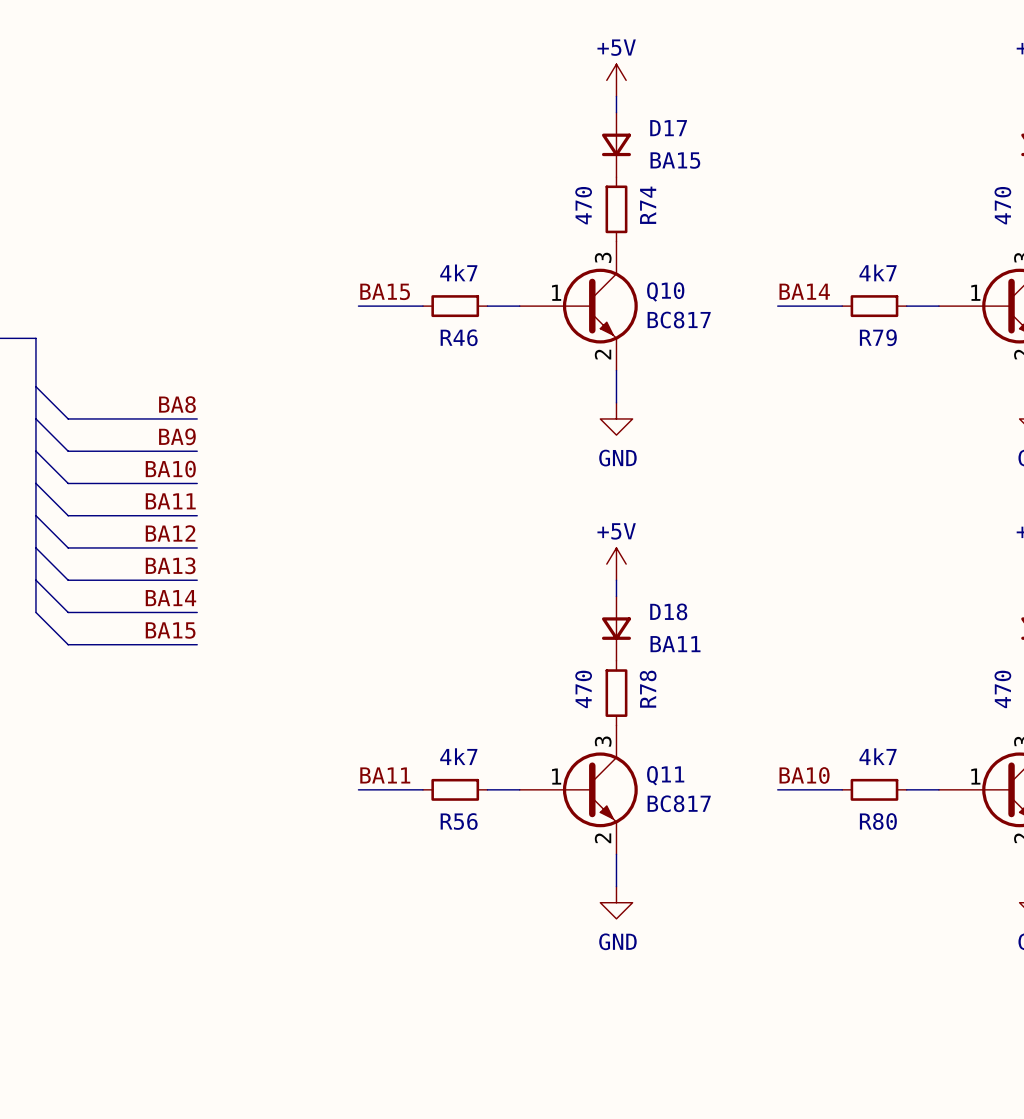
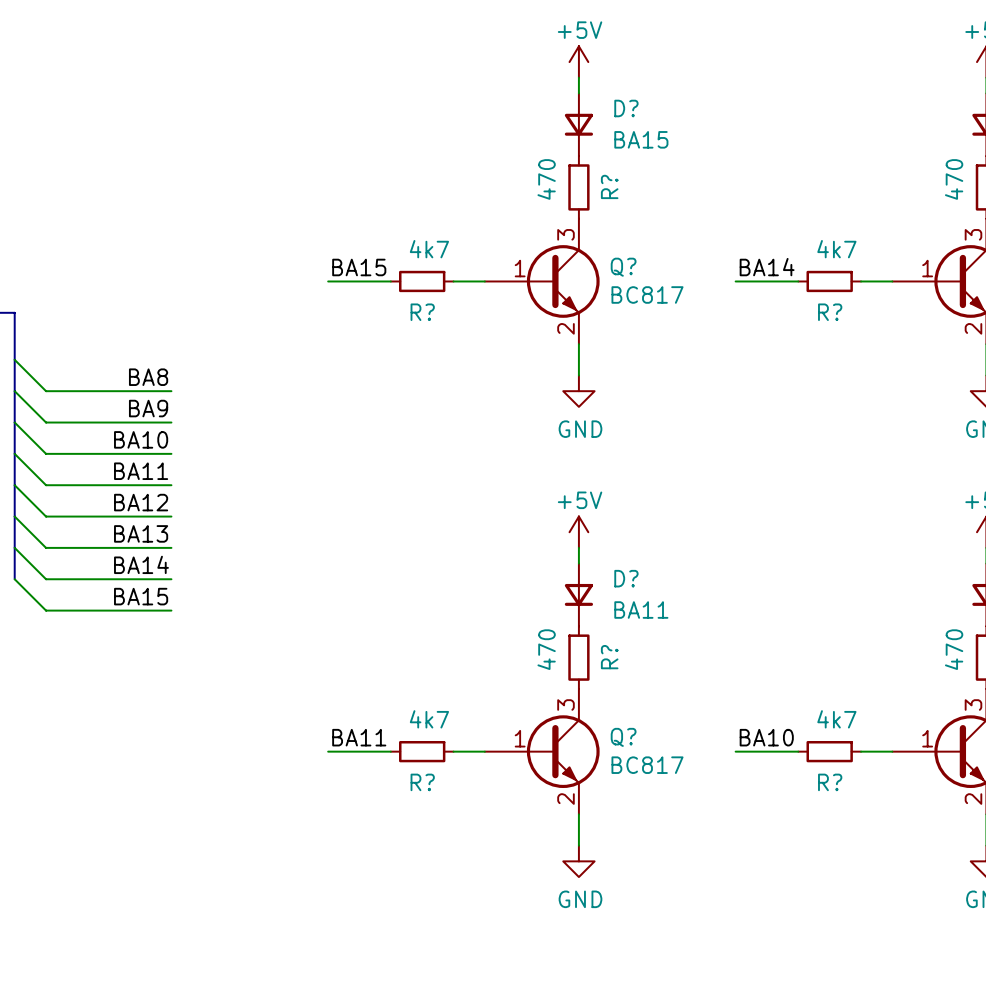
D17 name: D17 (668, 128) -> D? (626, 108)
R74 name: R74 (648, 205) -> R? (609, 186)
Q10 name: Q10 (665, 291) -> Q? (623, 267)
R46 name: R46 (459, 337) -> R? (422, 312)
R79 name: R79 (878, 337) -> R? (830, 312)
D18 name: D18 (668, 611) -> D? (626, 578)
R78 name: R78 (648, 689) -> R? (609, 657)
Q11 name: Q11 (665, 775) -> Q? (623, 737)
R56 name: R56 (459, 821) -> R? (422, 782)
R80 name: R80 (878, 821) -> R? (830, 782)

